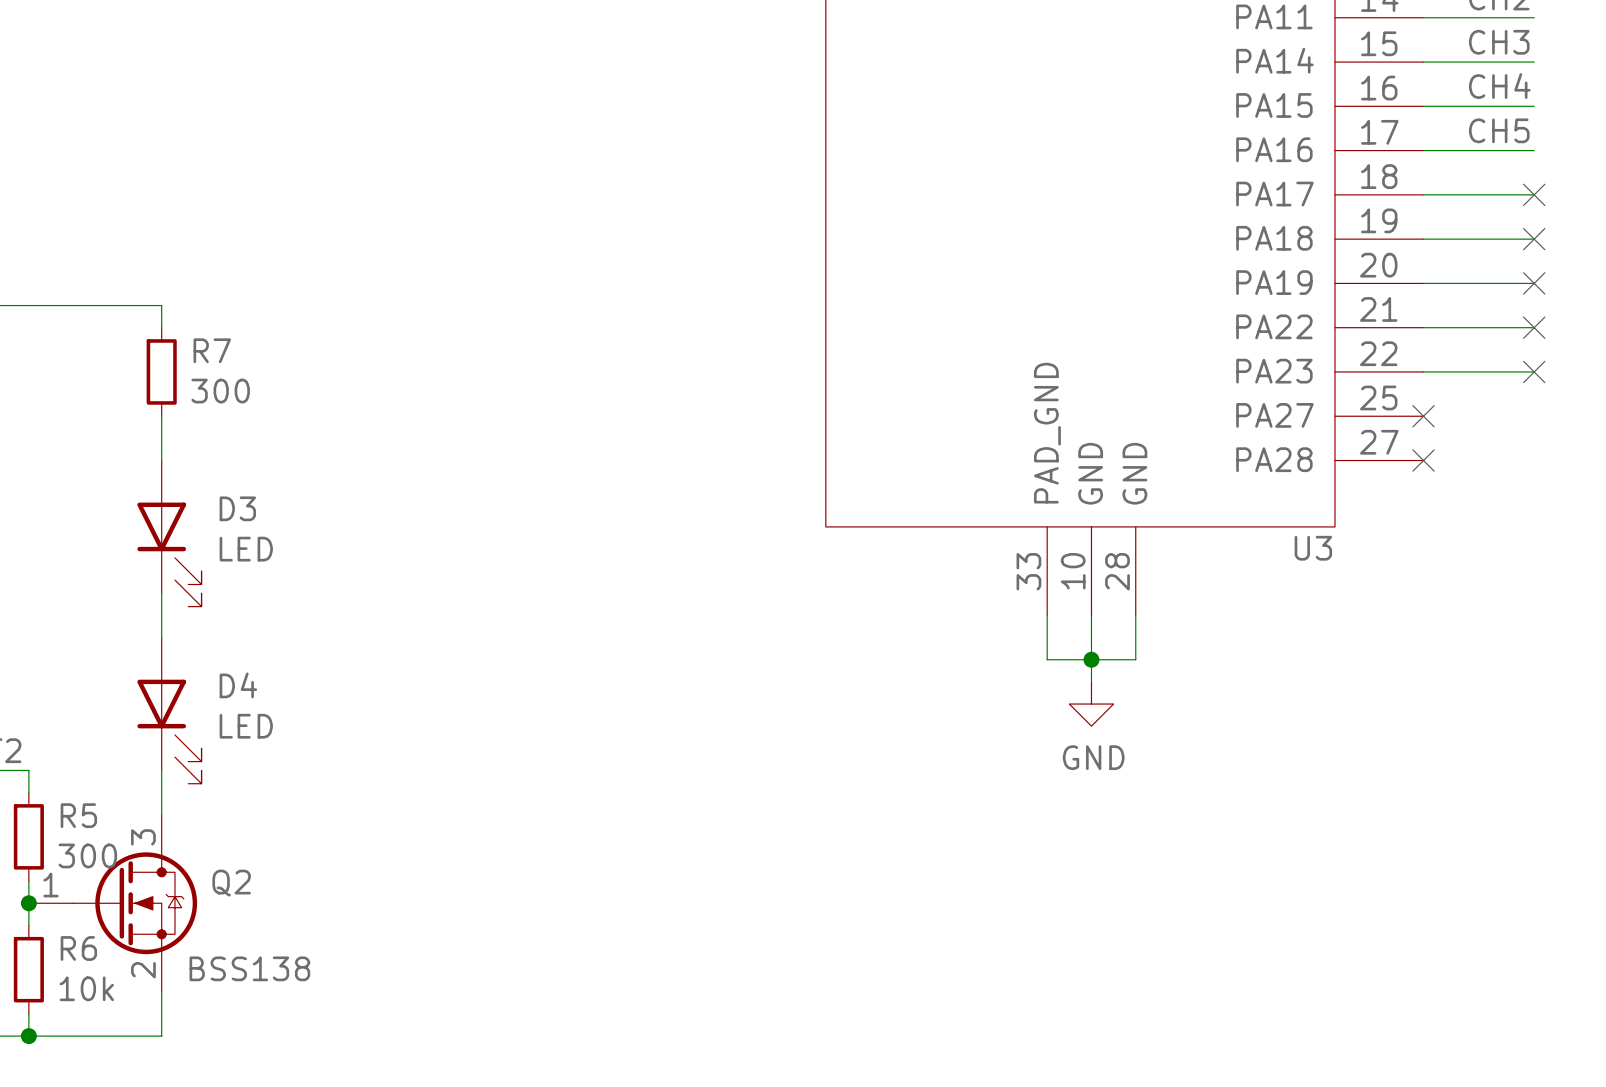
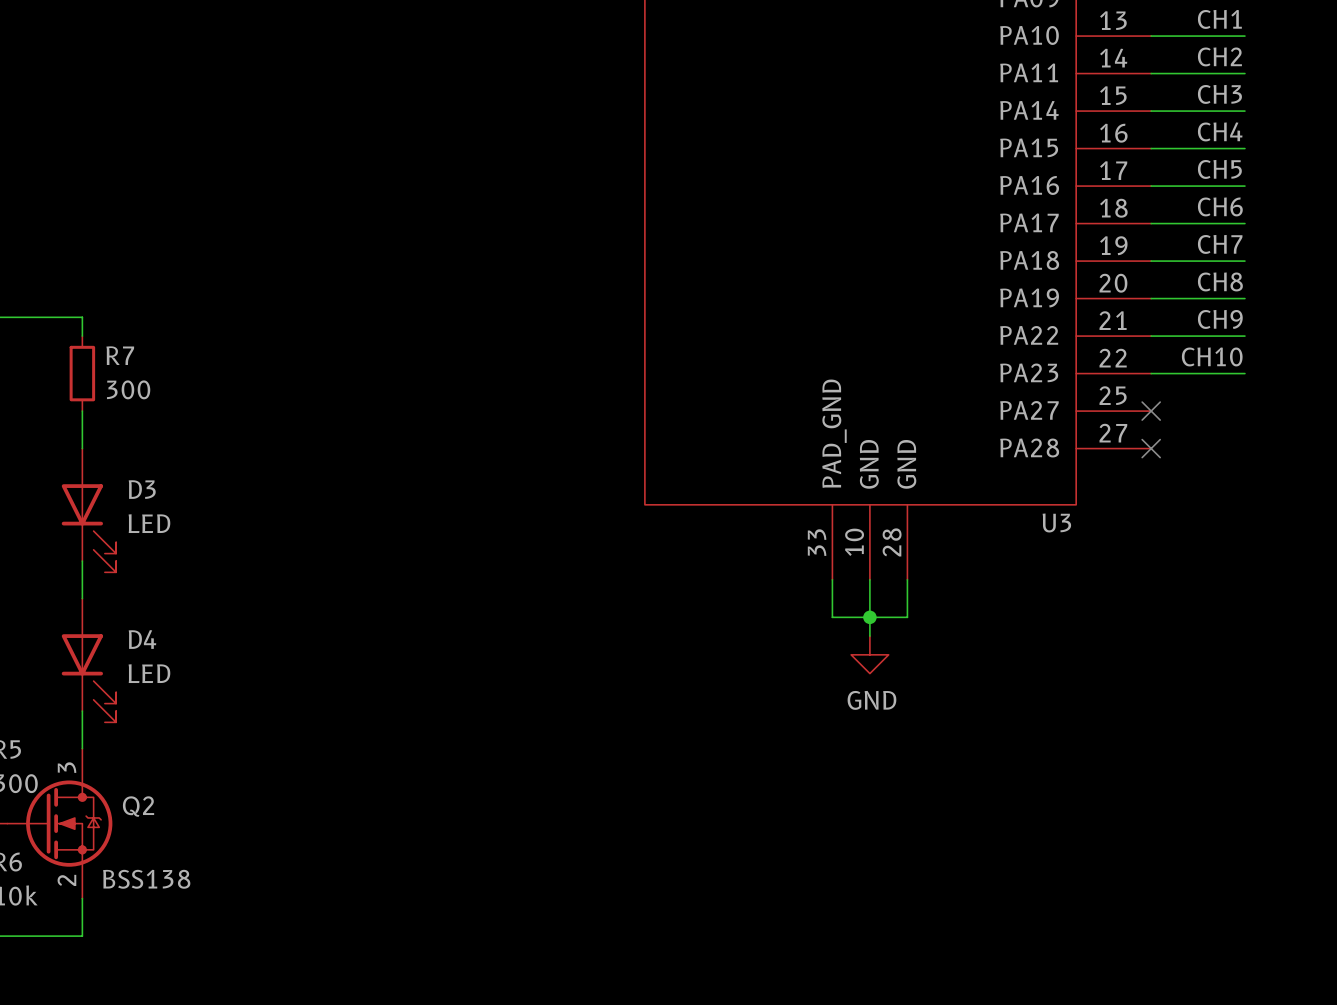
label: none -> CH6 (1220, 206)
no-connect mark: (1534, 194) -> none
label: none -> CH7 (1220, 244)
no-connect mark: (1534, 239) -> none
label: none -> CH8 (1220, 281)
no-connect mark: (1534, 283) -> none
label: none -> CH9 (1220, 319)
no-connect mark: (1534, 327) -> none
label: none -> CH10 (1212, 356)
no-connect mark: (1534, 371) -> none

